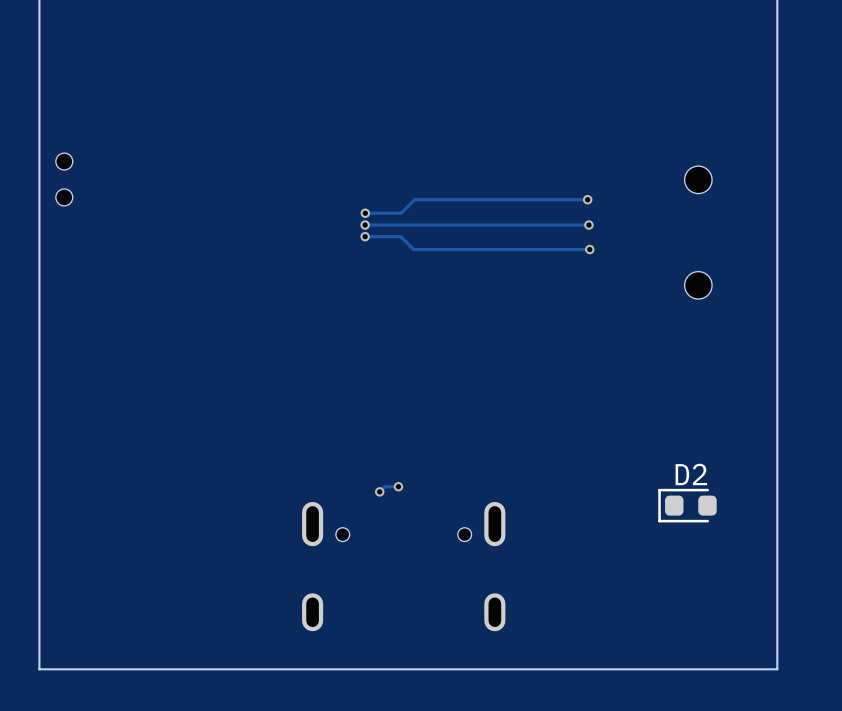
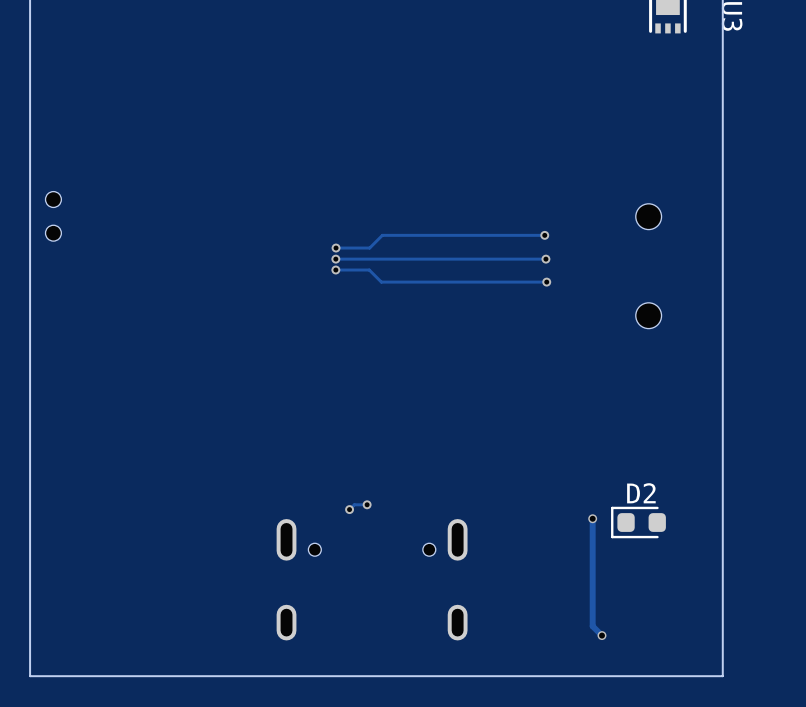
track: none -> (592, 518) (592, 626) (601, 635)
via: none -> (592, 518)
via: none -> (601, 635)

